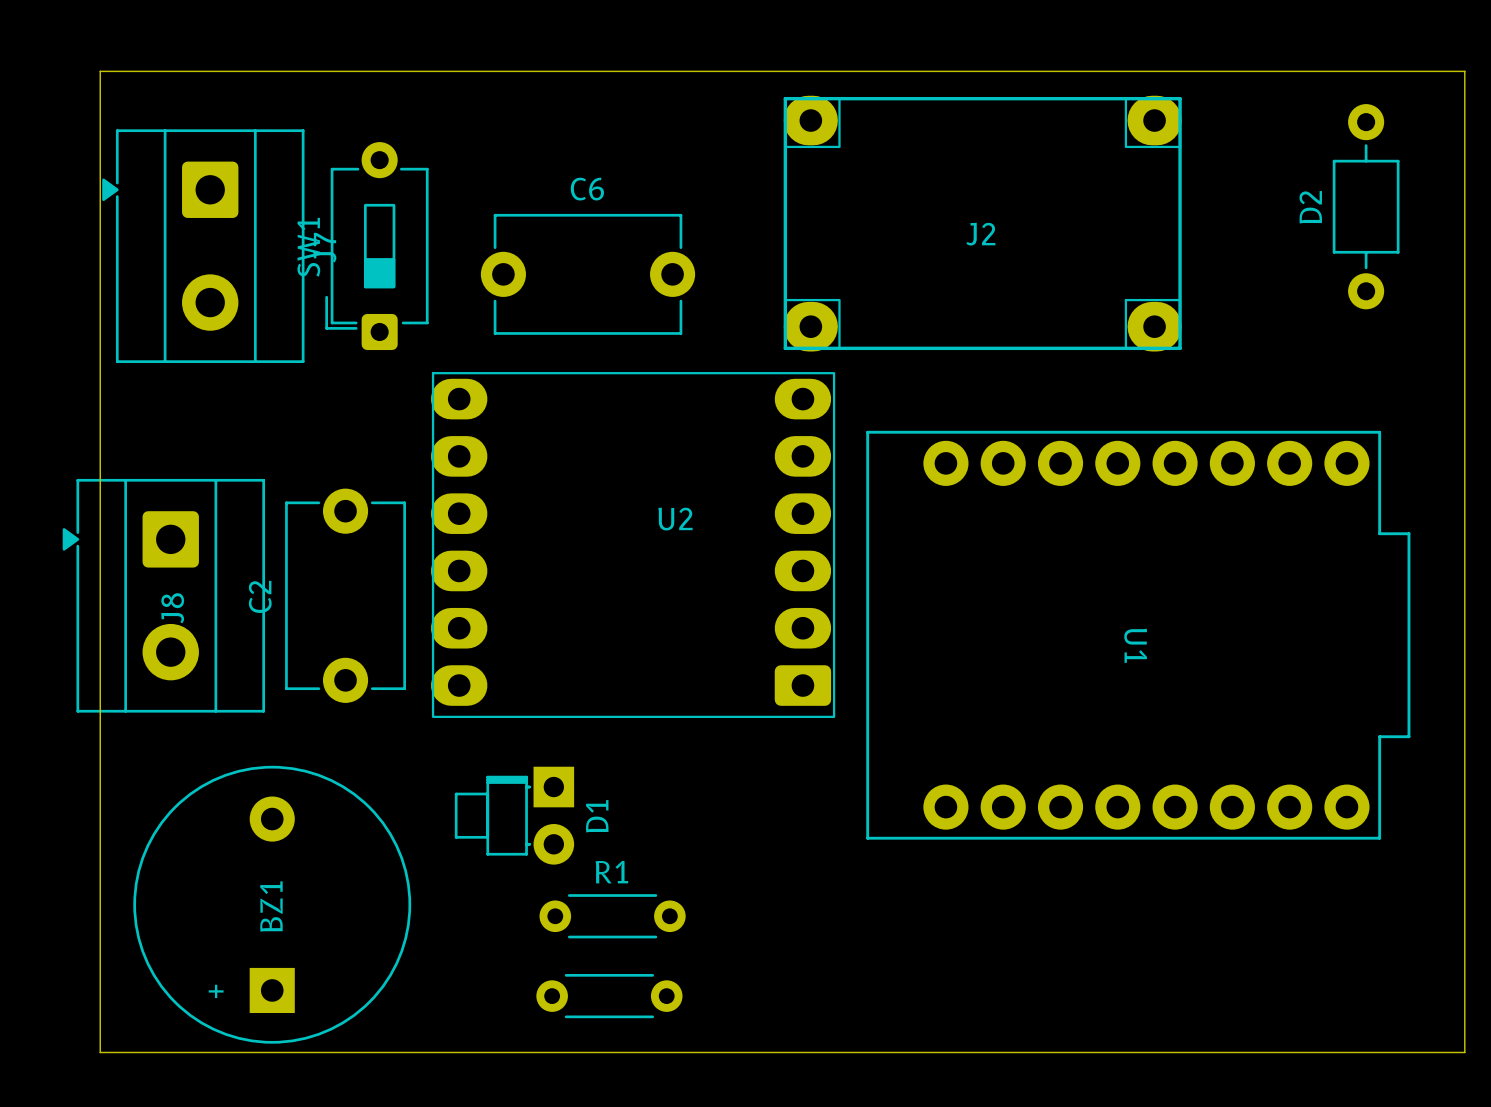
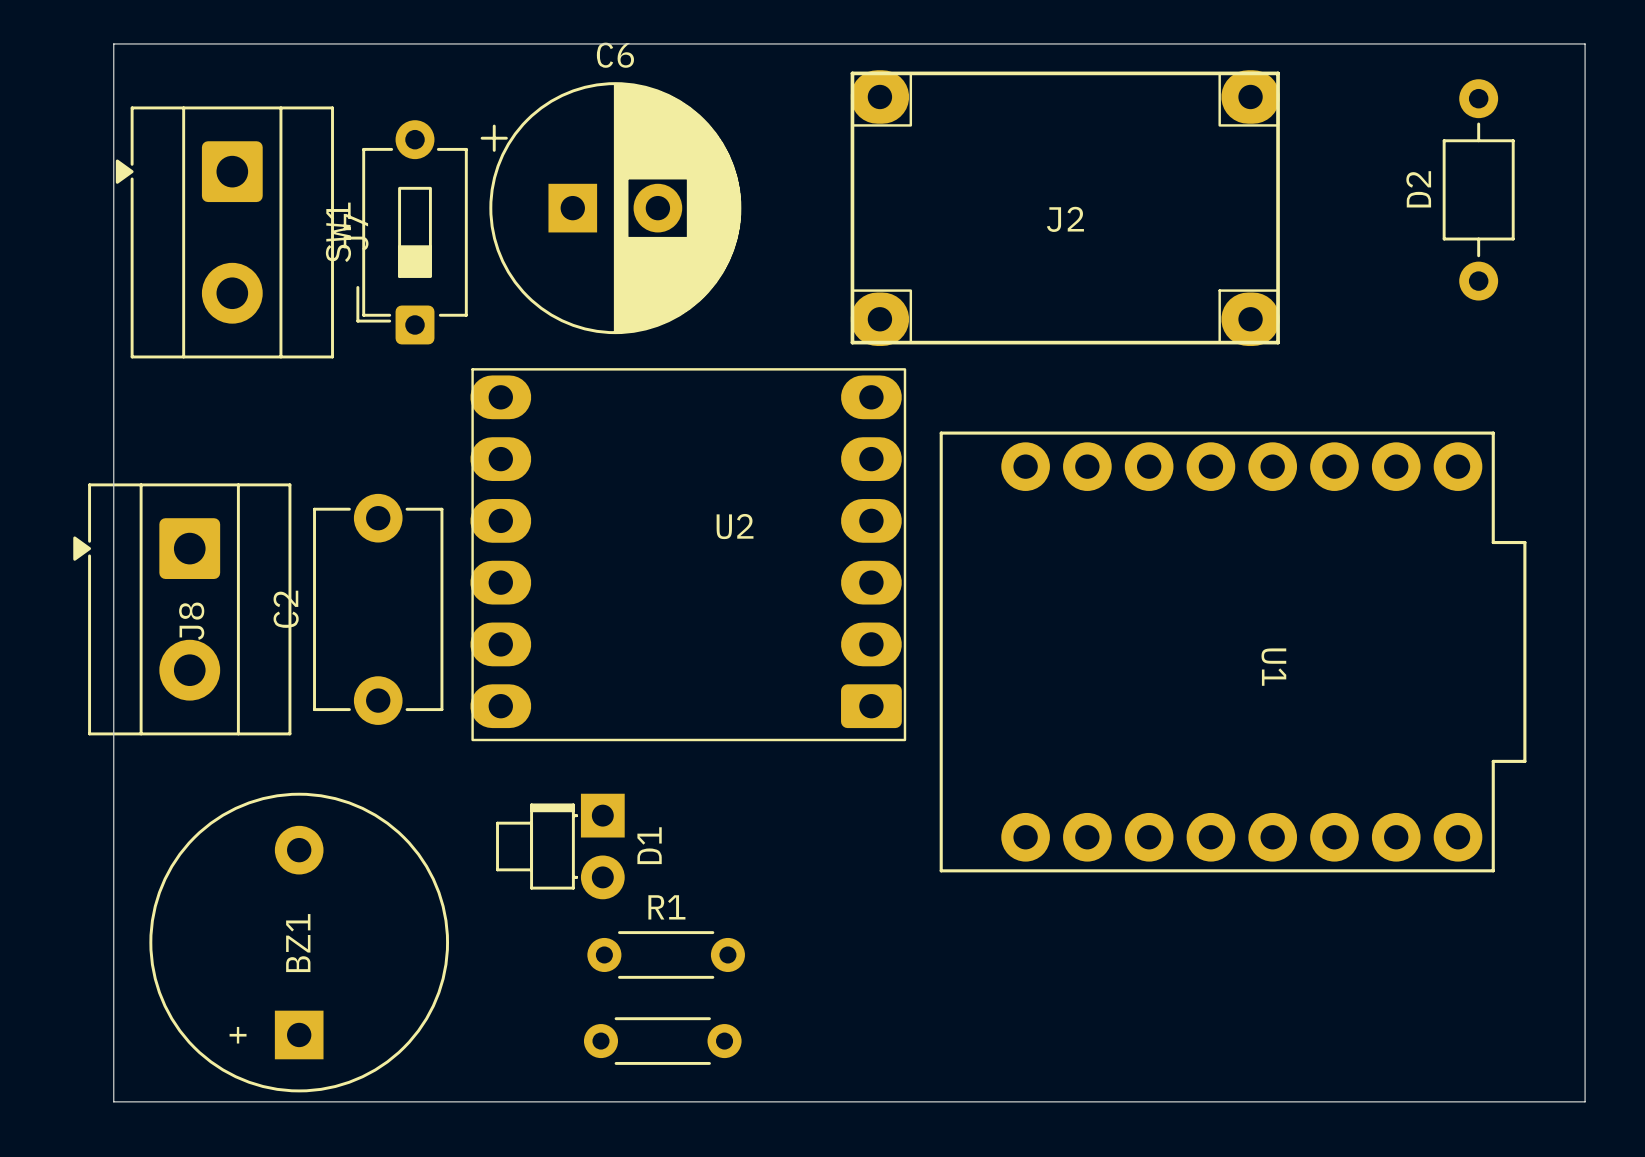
C6 name position: C6 (587, 189) -> C6 (615, 55)
C6 footprint: [480, 213, 696, 335] -> [480, 82, 742, 335]
U1 name position: U1 (1135, 645) -> U1 (1273, 667)

